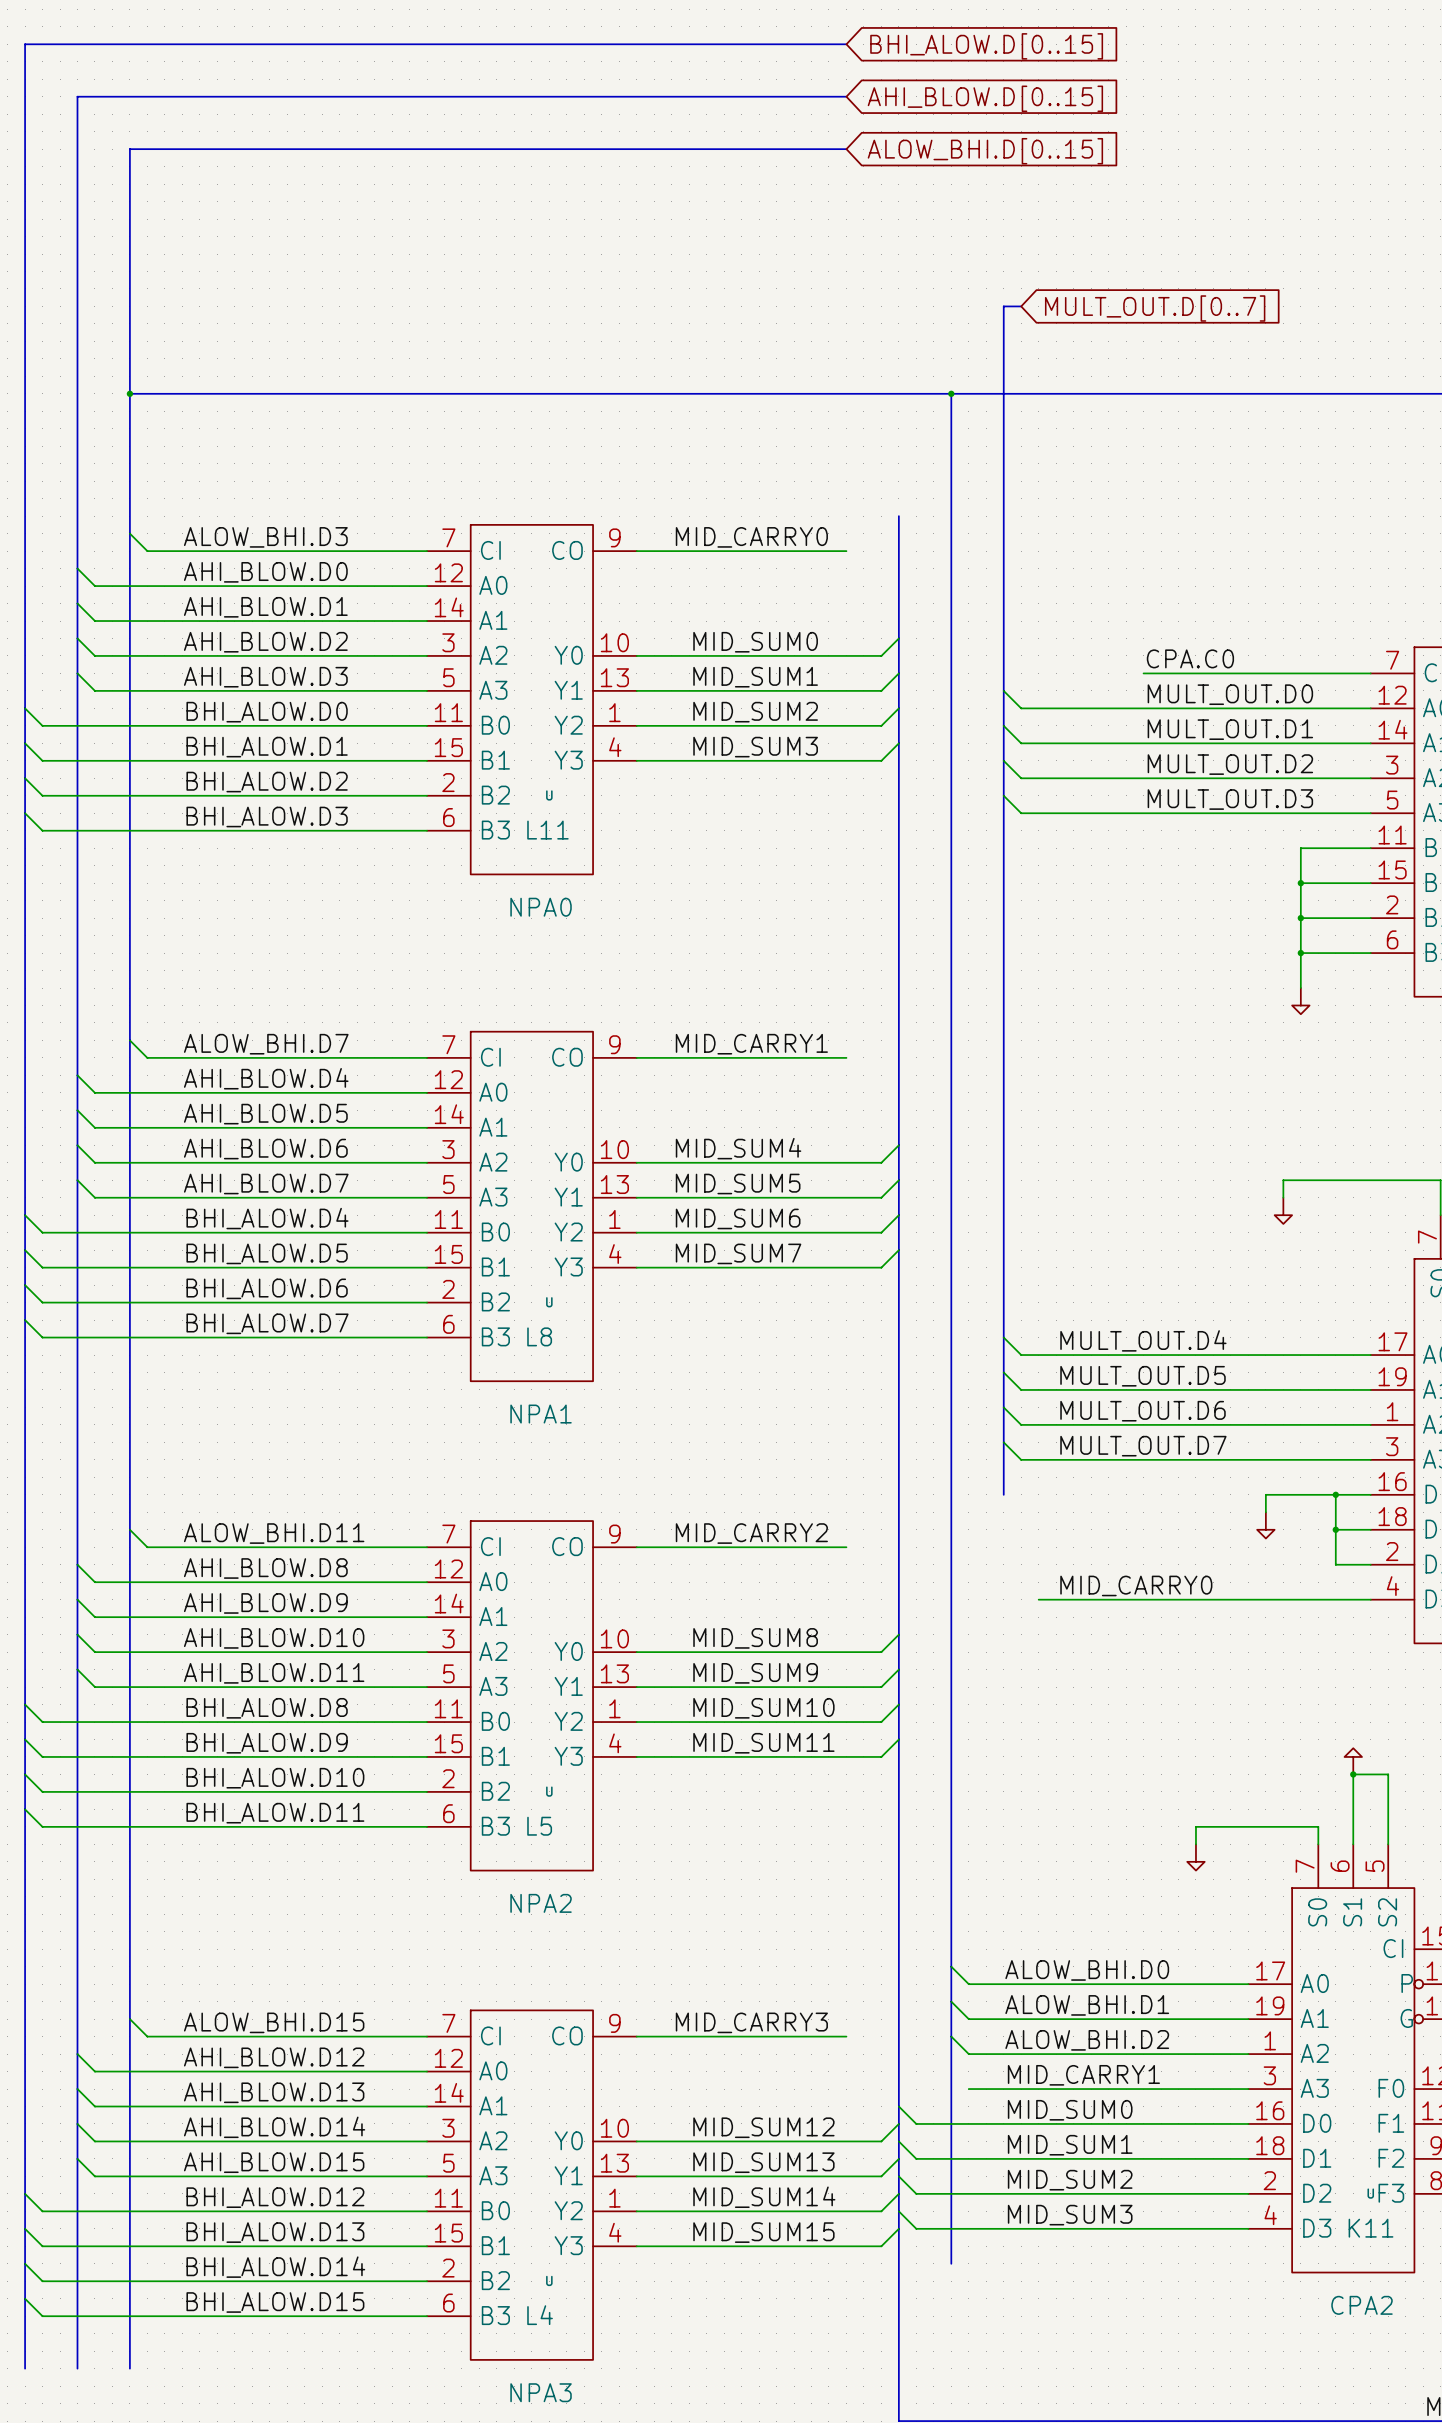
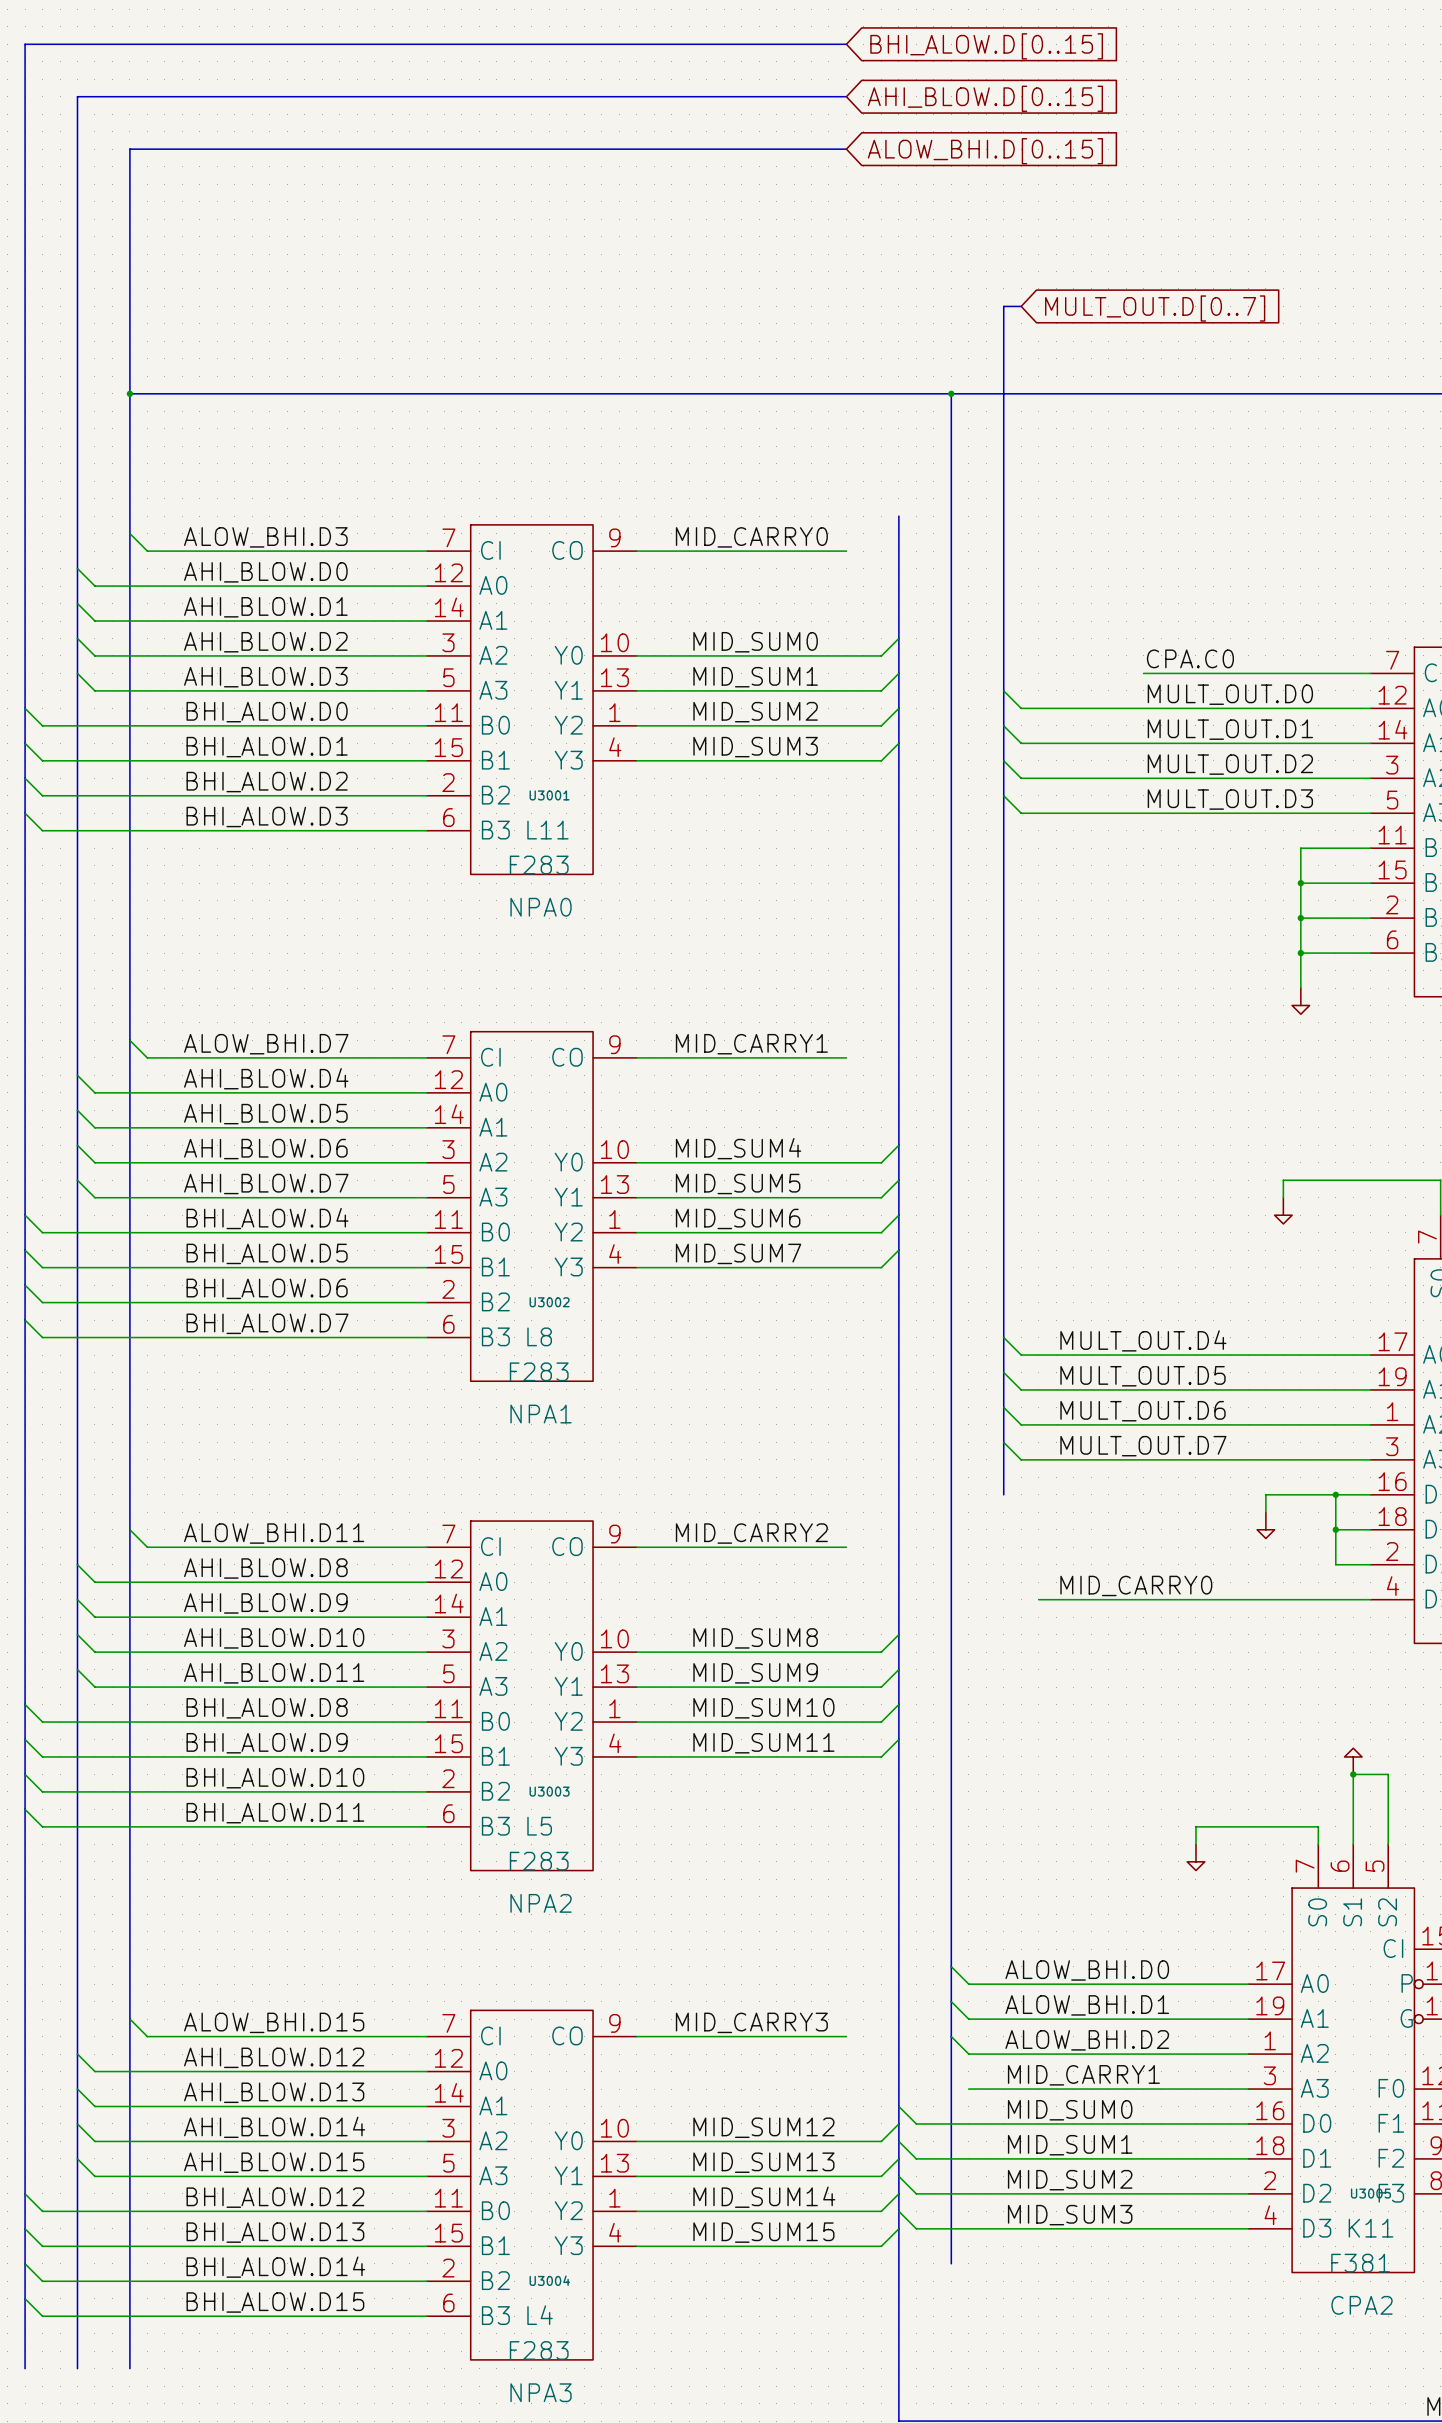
U name: U (549, 795) -> U3001 (549, 795)
U value: none -> F283 (539, 865)
U name: U (549, 1302) -> U3002 (549, 1302)
U value: none -> F283 (539, 1371)
U name: U (549, 1791) -> U3003 (549, 1791)
U value: none -> F283 (539, 1861)
U name: U (1370, 2193) -> U3005 (1370, 2193)
U value: none -> F381 (1360, 2263)
U name: U (549, 2280) -> U3004 (549, 2280)
U value: none -> F283 (539, 2350)

